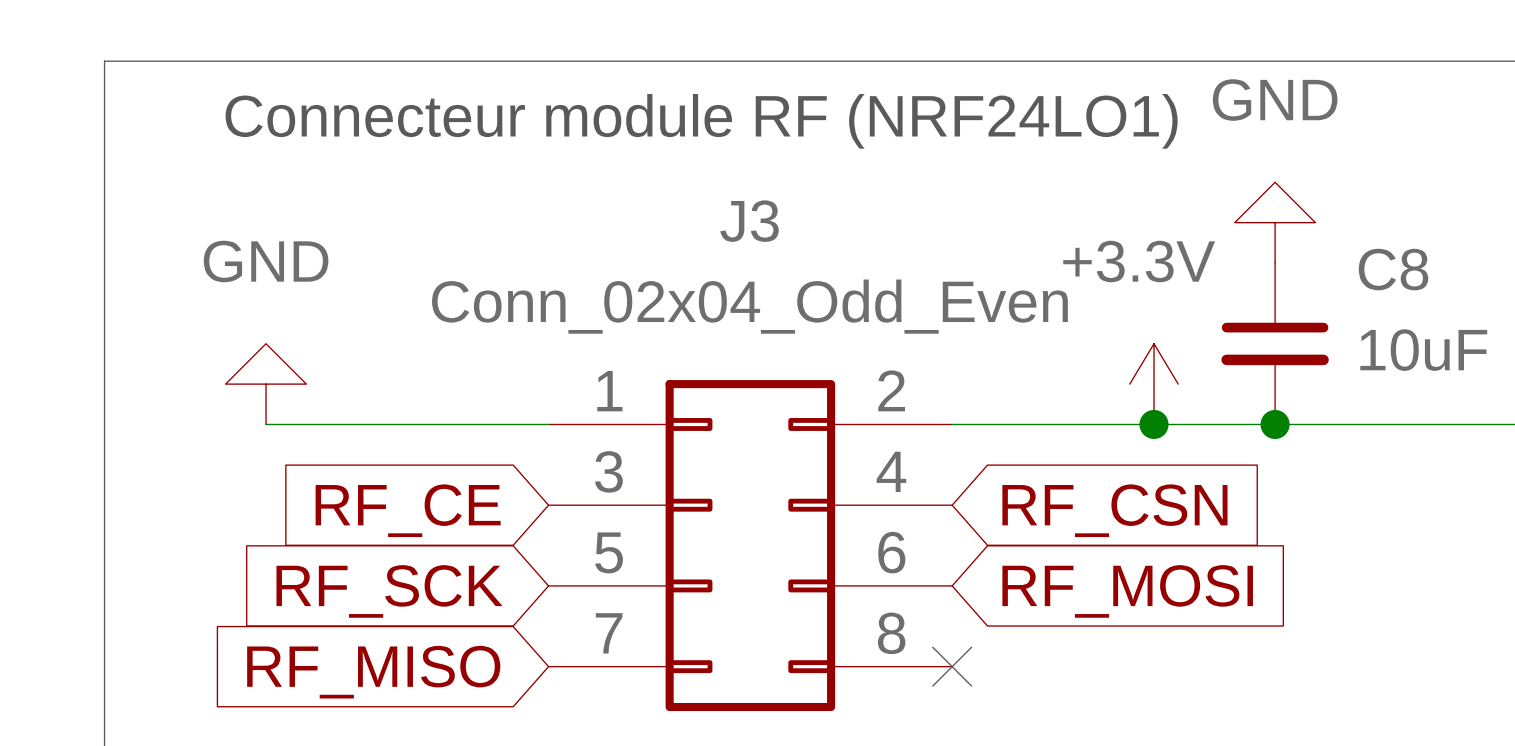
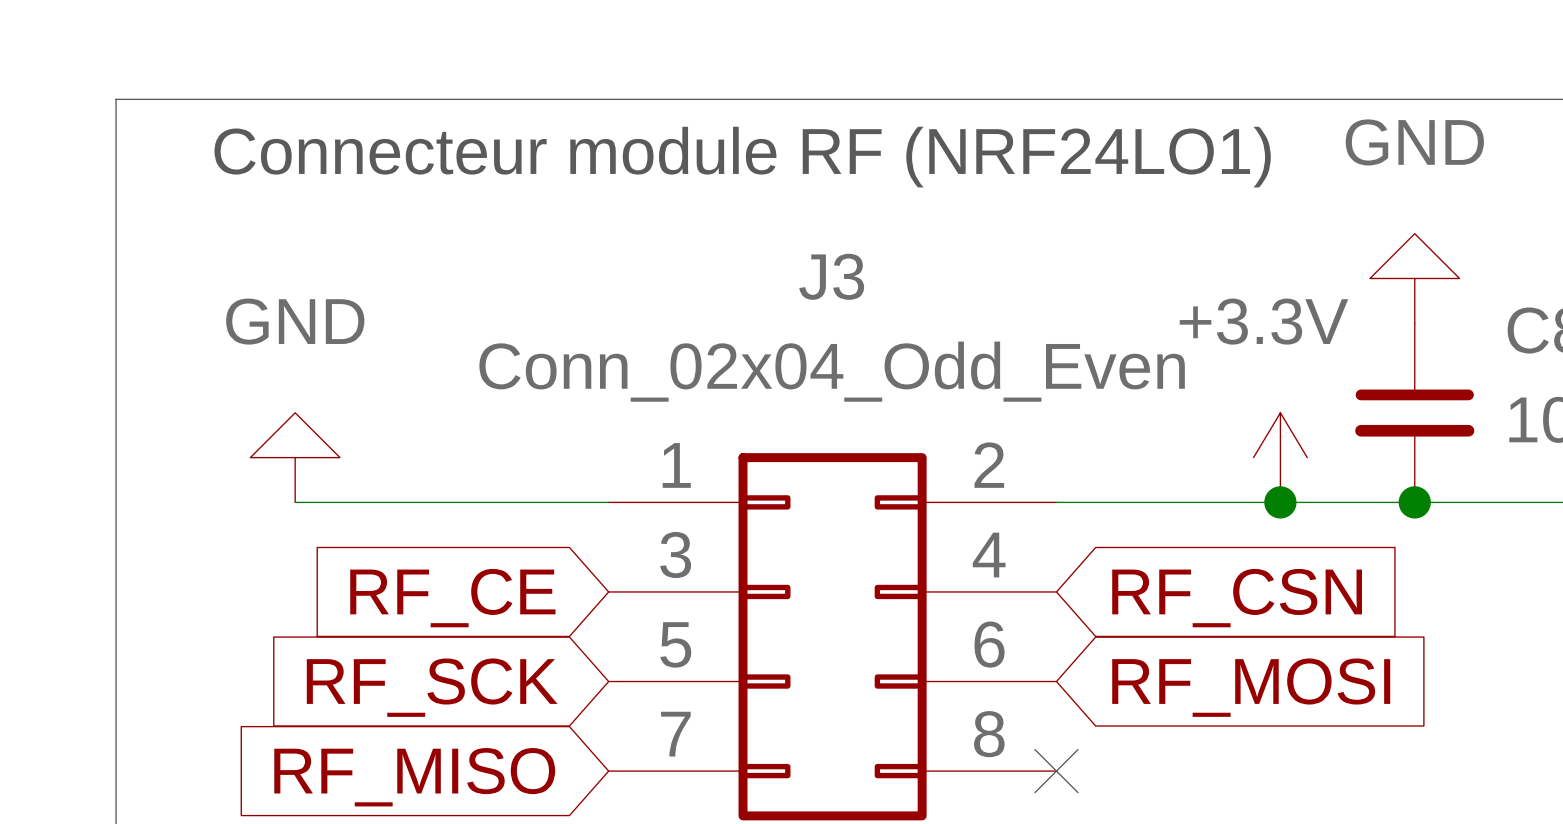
text position: Connecteur module RF (NRF24LO1) (701, 121) -> Connecteur module RF (NRF24LO1) (742, 157)

